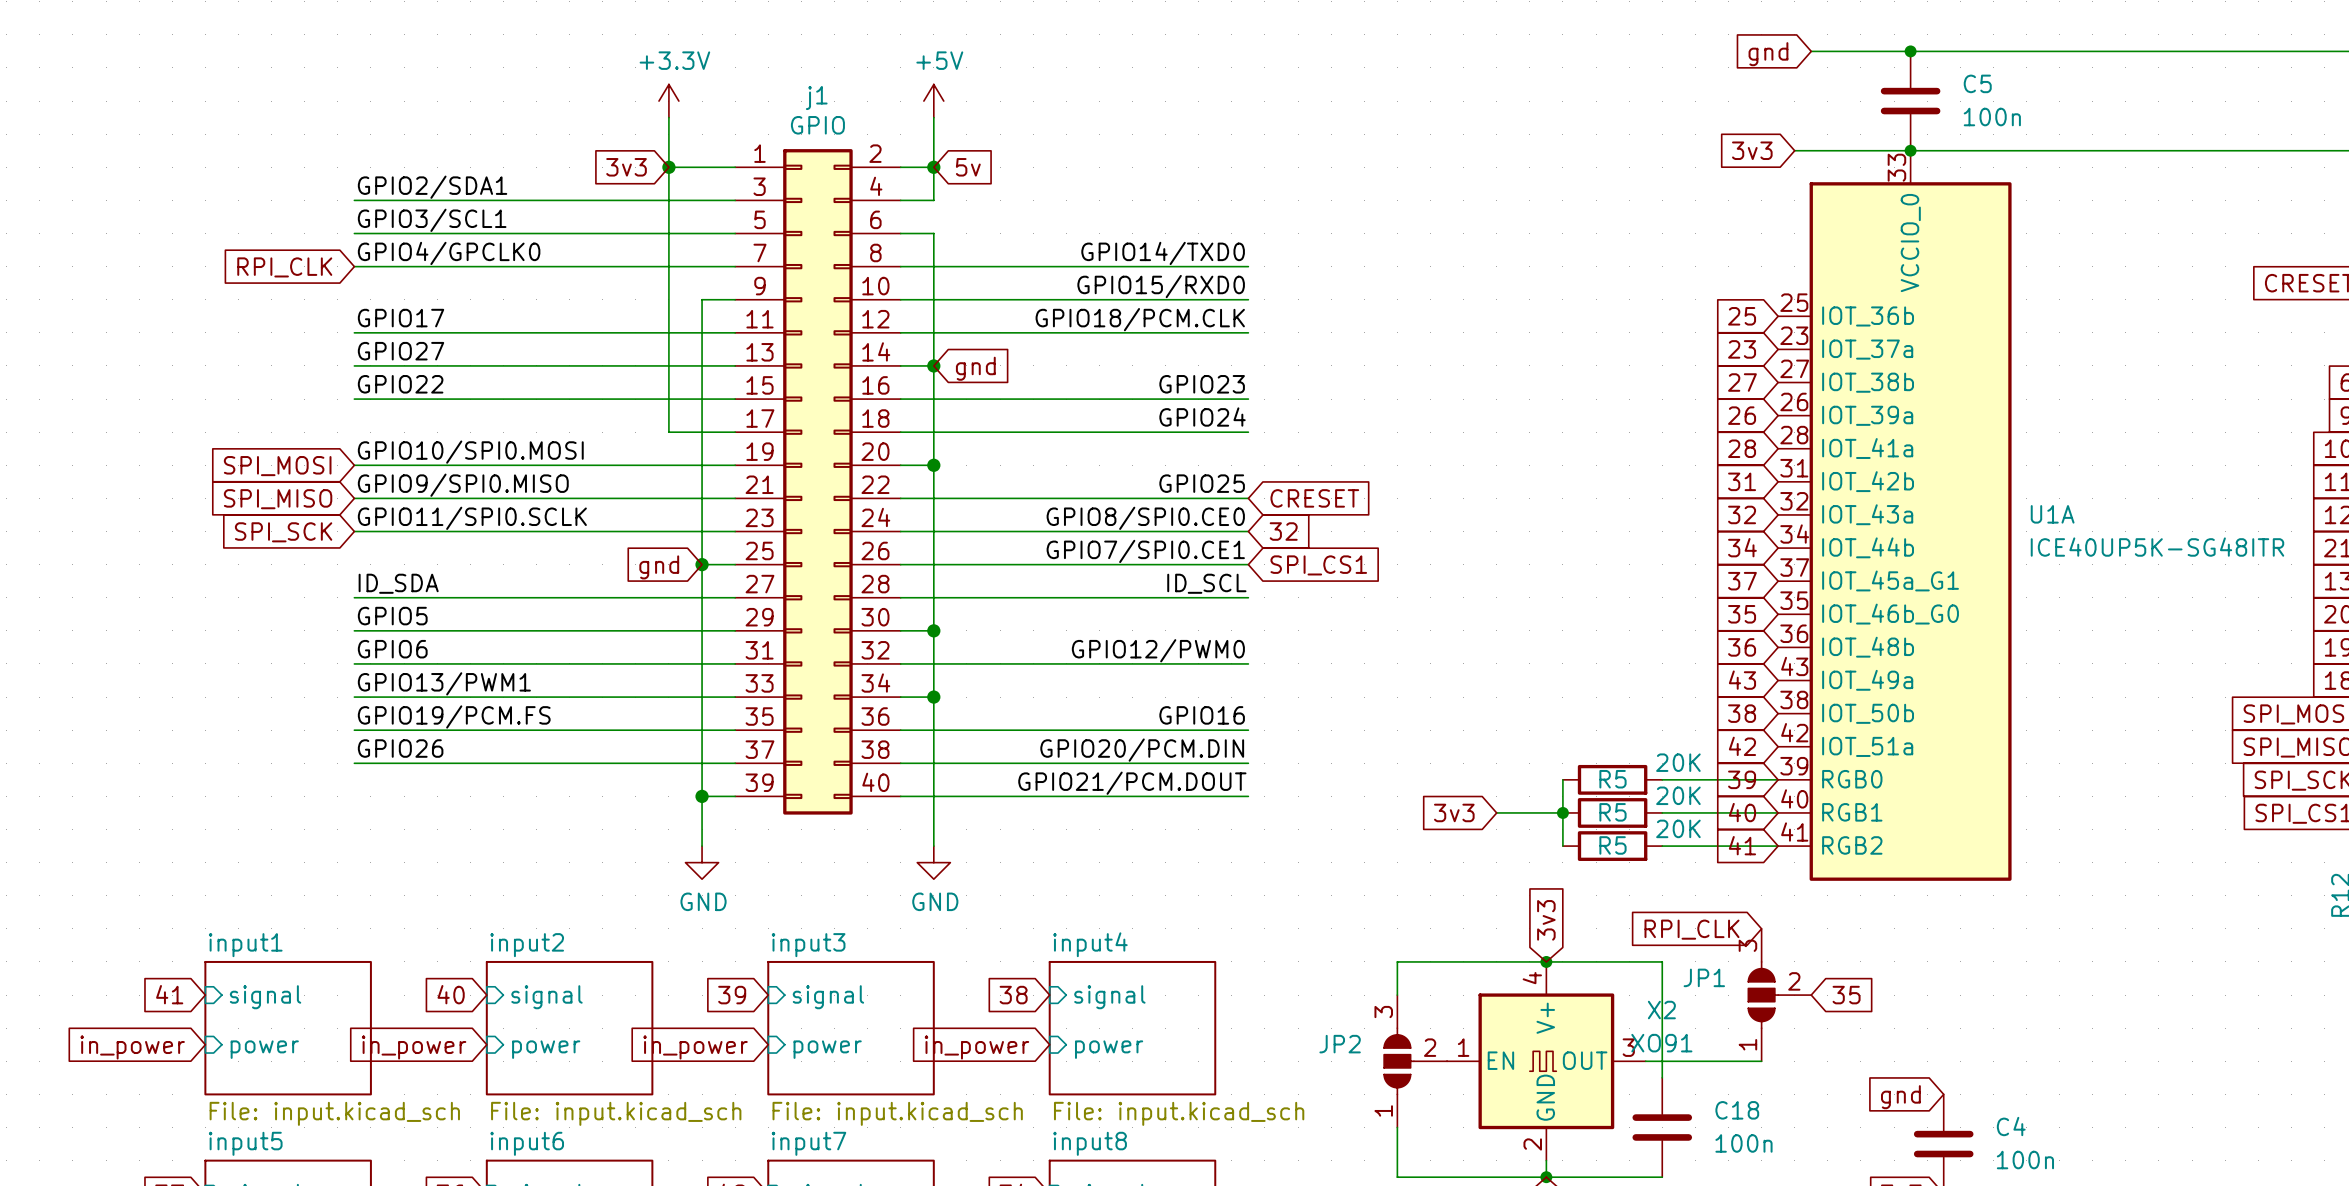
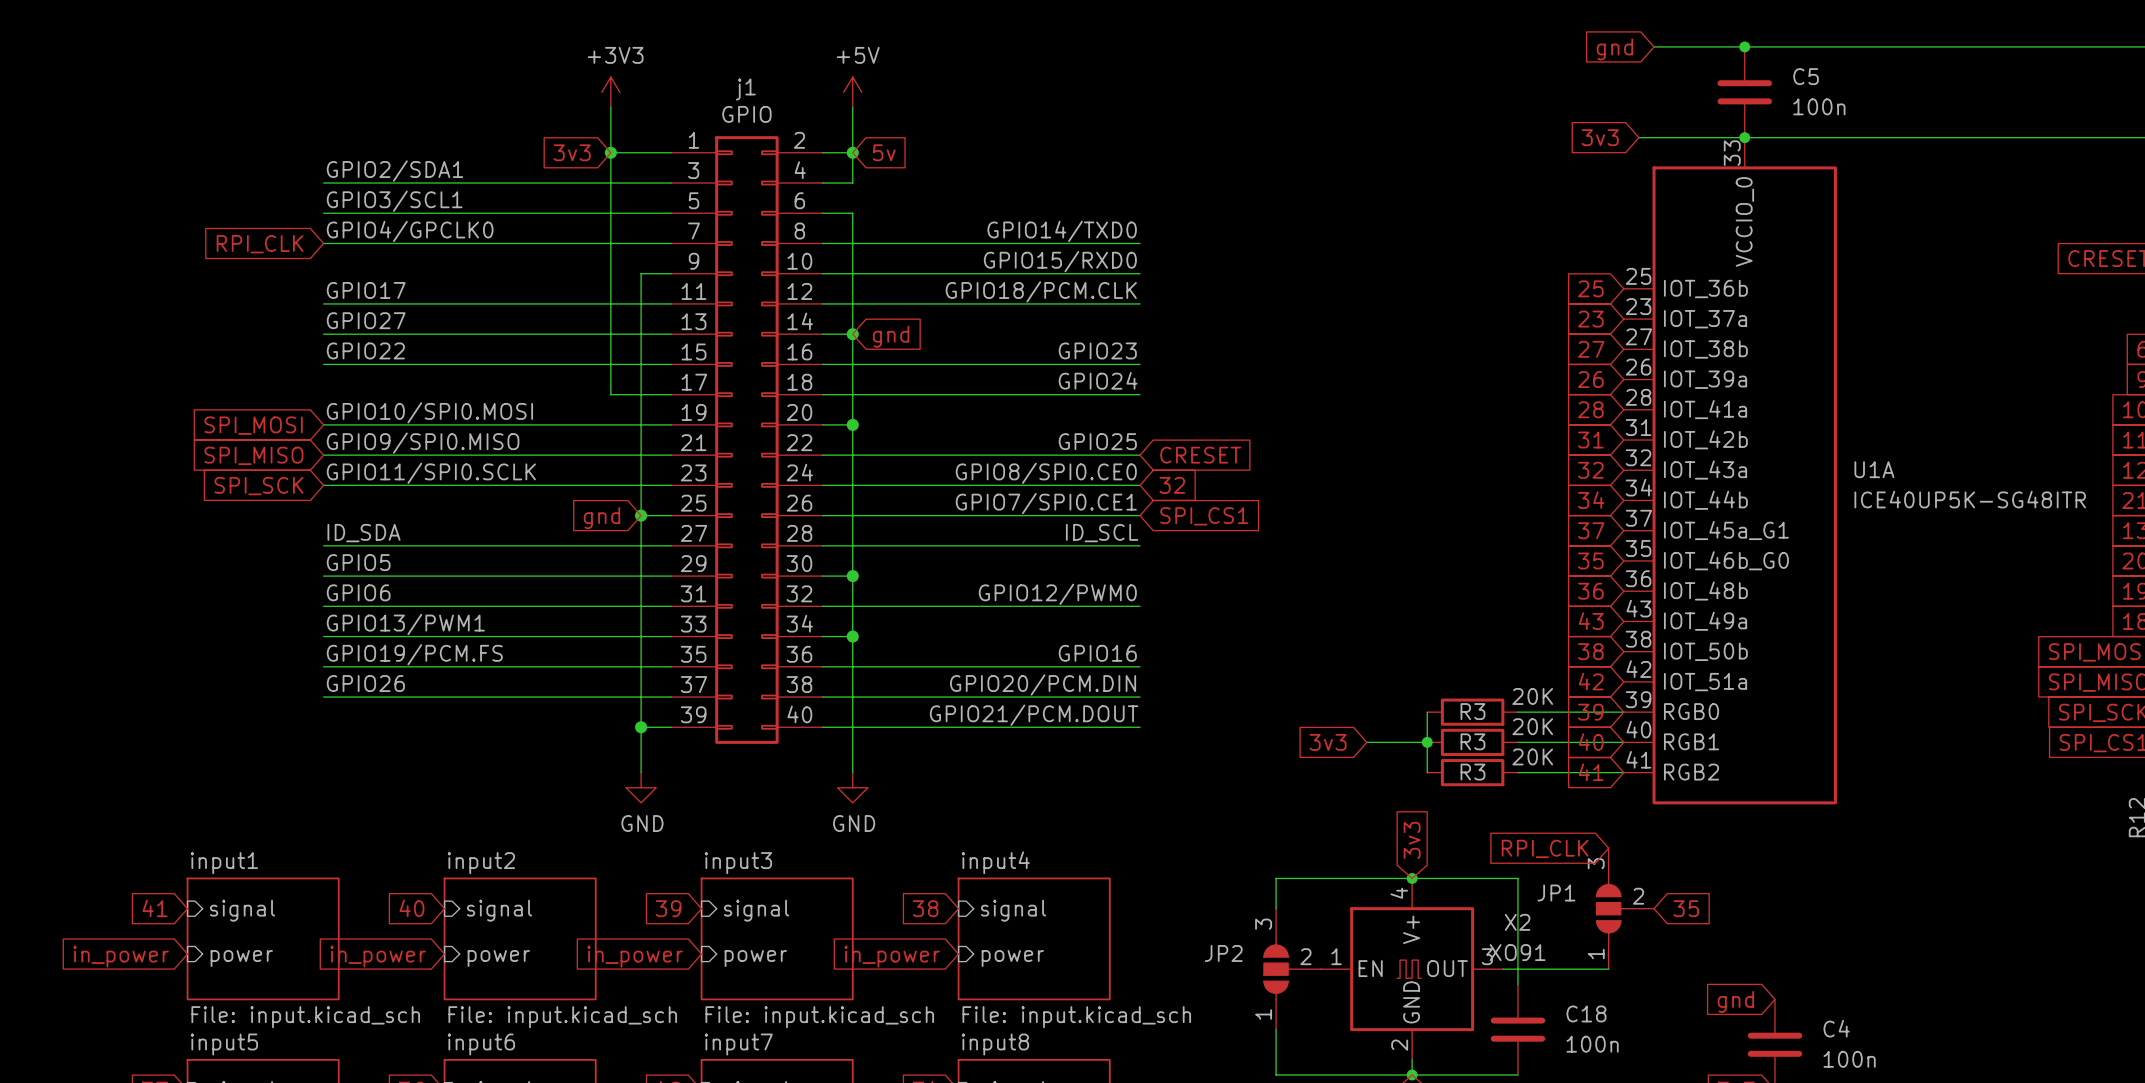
power symbol: +3.3V (668, 101) -> +3V3 (610, 92)
R5 name: R5 (1612, 779) -> R3 (1472, 711)
R5 name: R5 (1612, 812) -> R3 (1472, 741)
R5 name: R5 (1612, 845) -> R3 (1472, 772)

